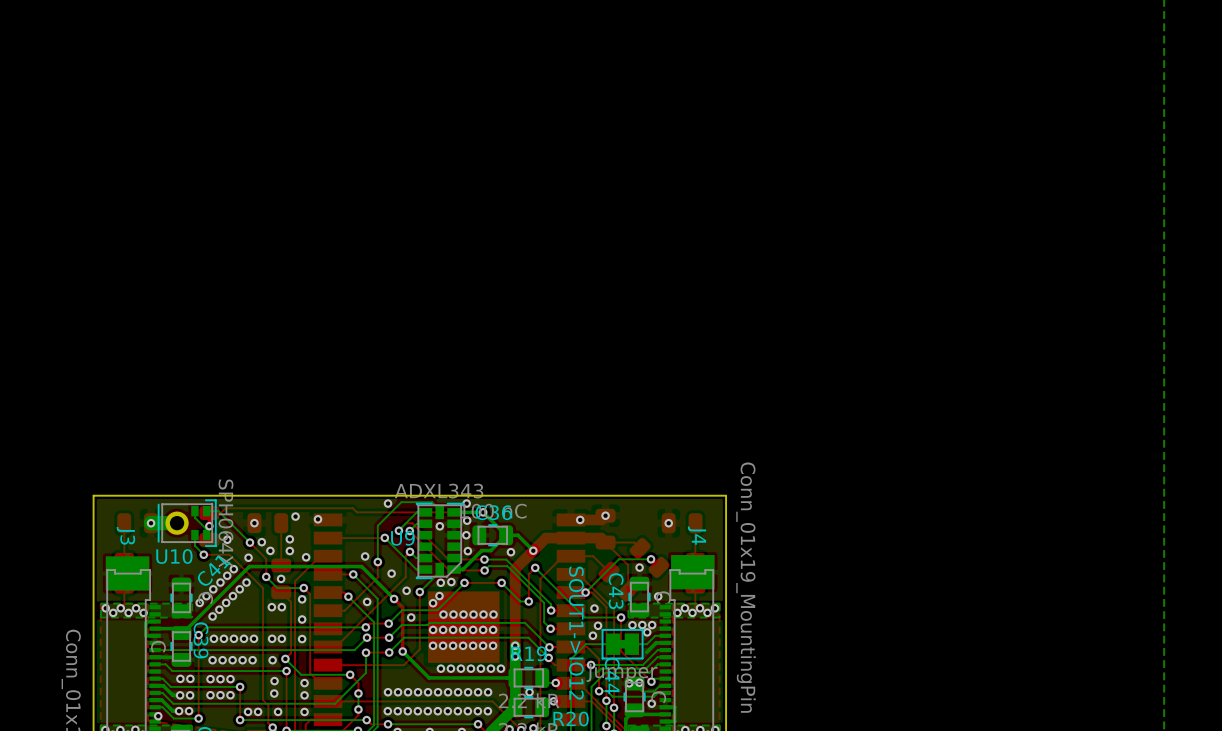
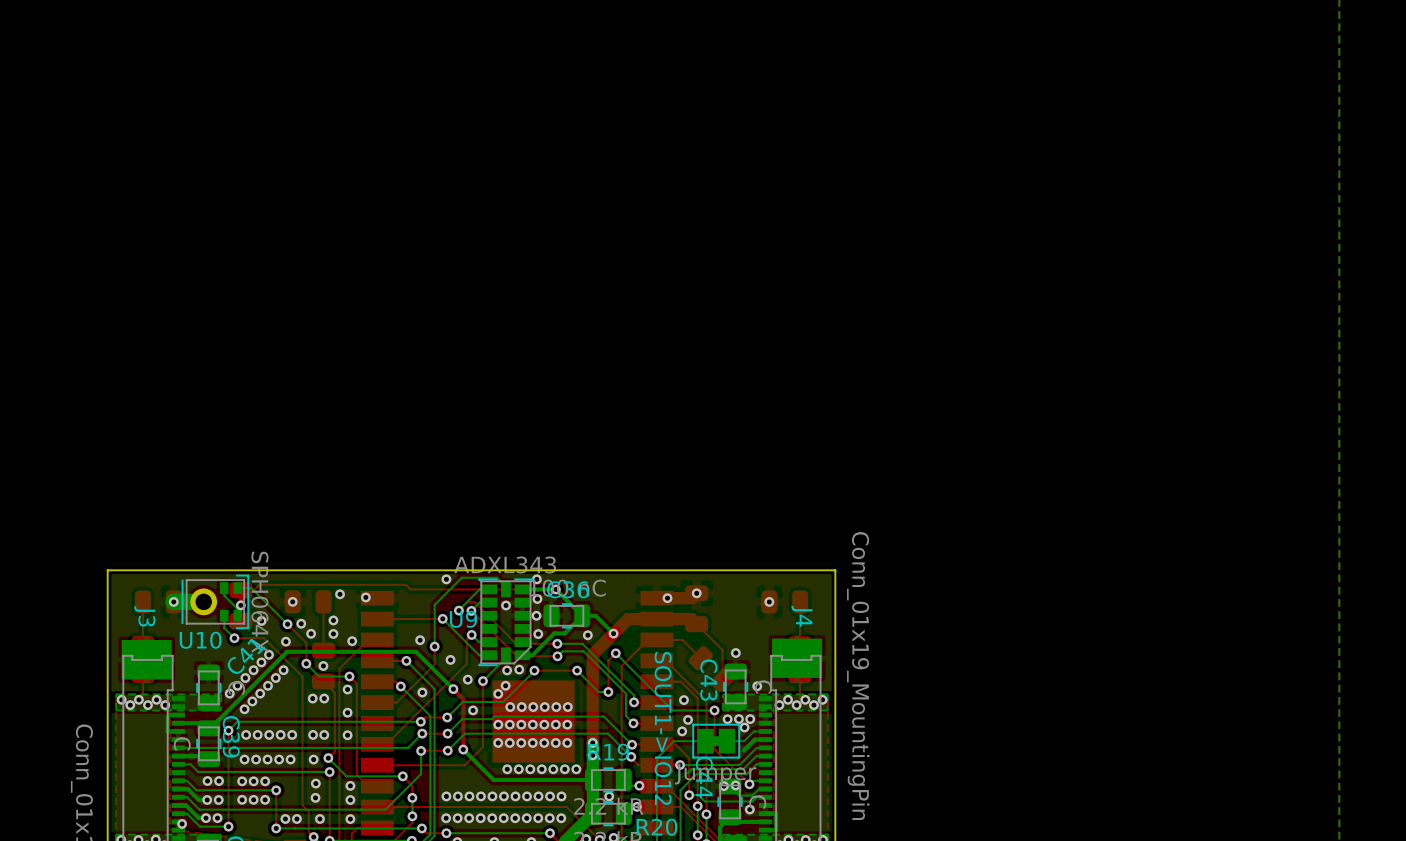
top track: (605, 542) (634, 542) (640, 548) -> none
part: (649, 557) -> none
bottom track: (651, 559) (618, 559) (585, 592) -> none
via: (651, 559) -> none
via: (585, 592) -> none

